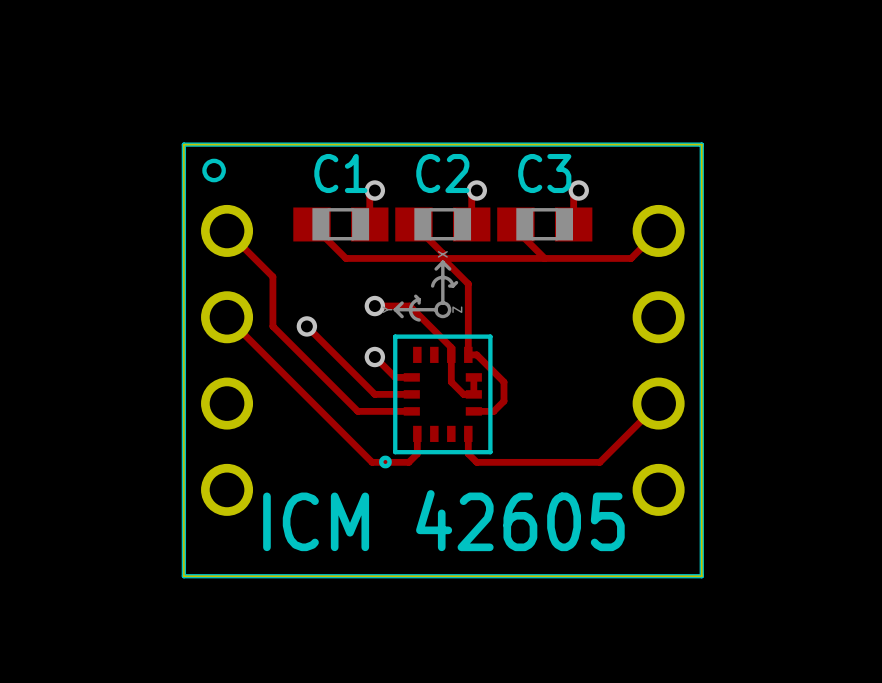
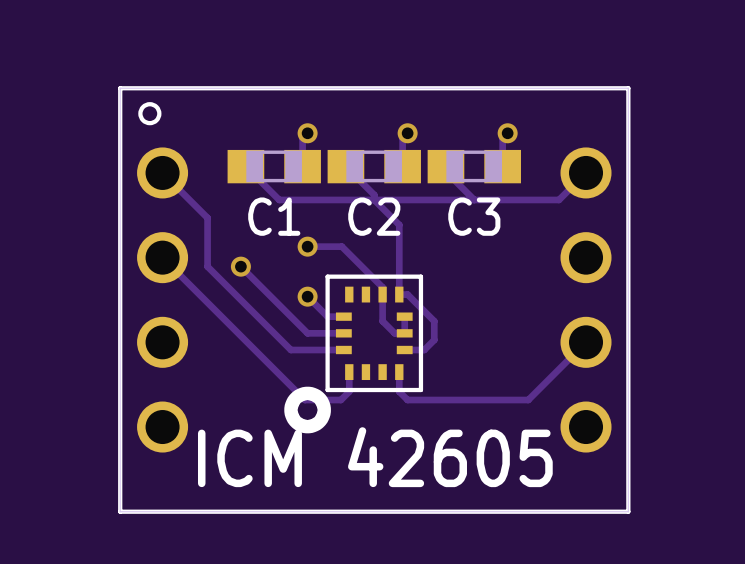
C1 name position: C1 (340, 173) -> C1 (274, 216)
C2 name position: C2 (442, 173) -> C2 (374, 216)
C3 name position: C3 (544, 173) -> C3 (474, 216)
part: (435, 364) -> none
part: none -> (353, 353)

